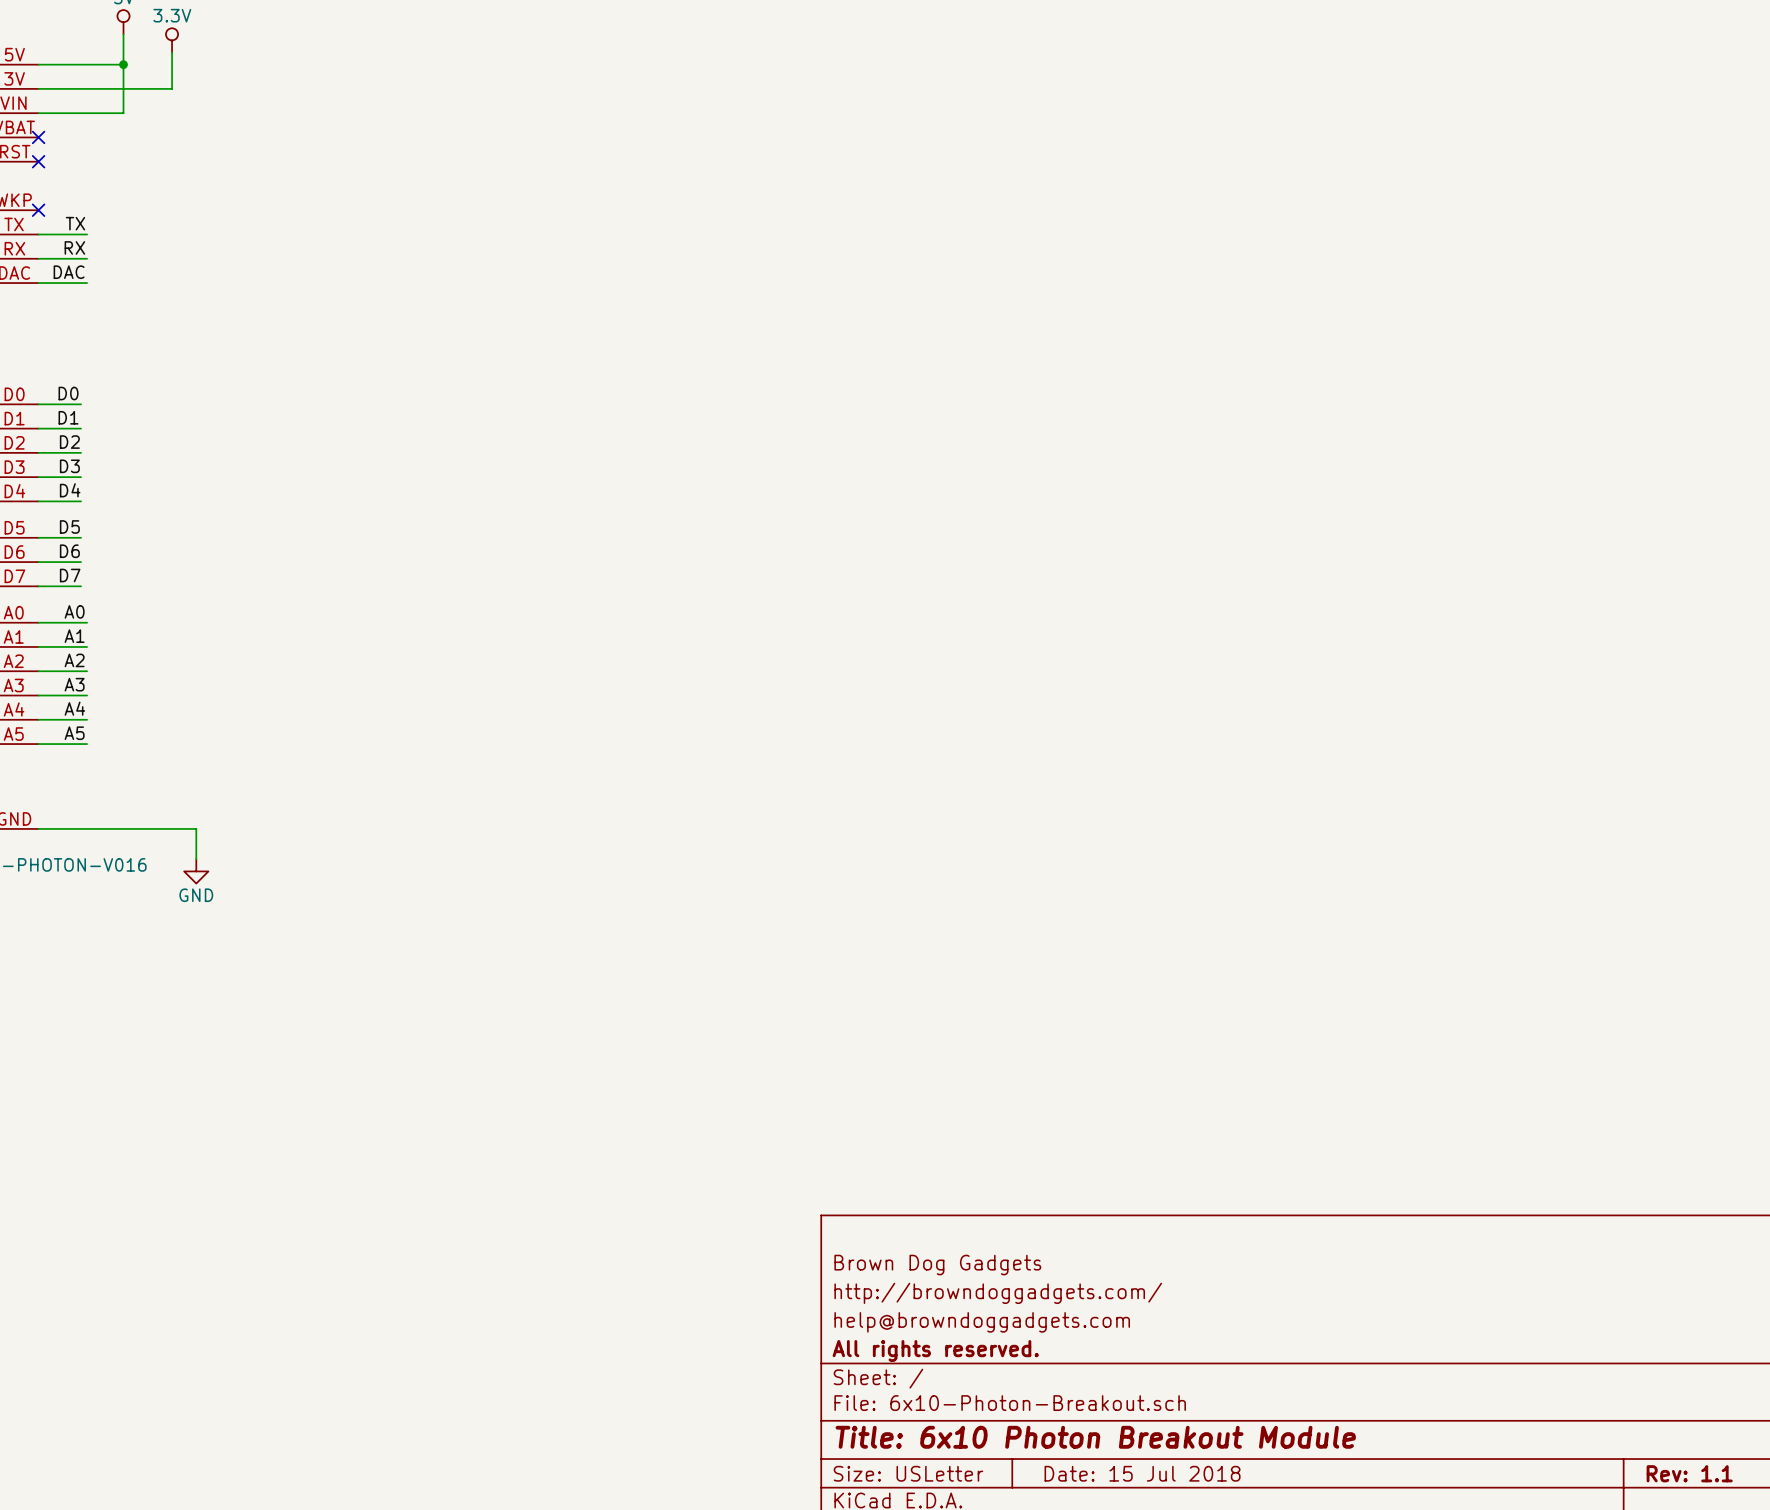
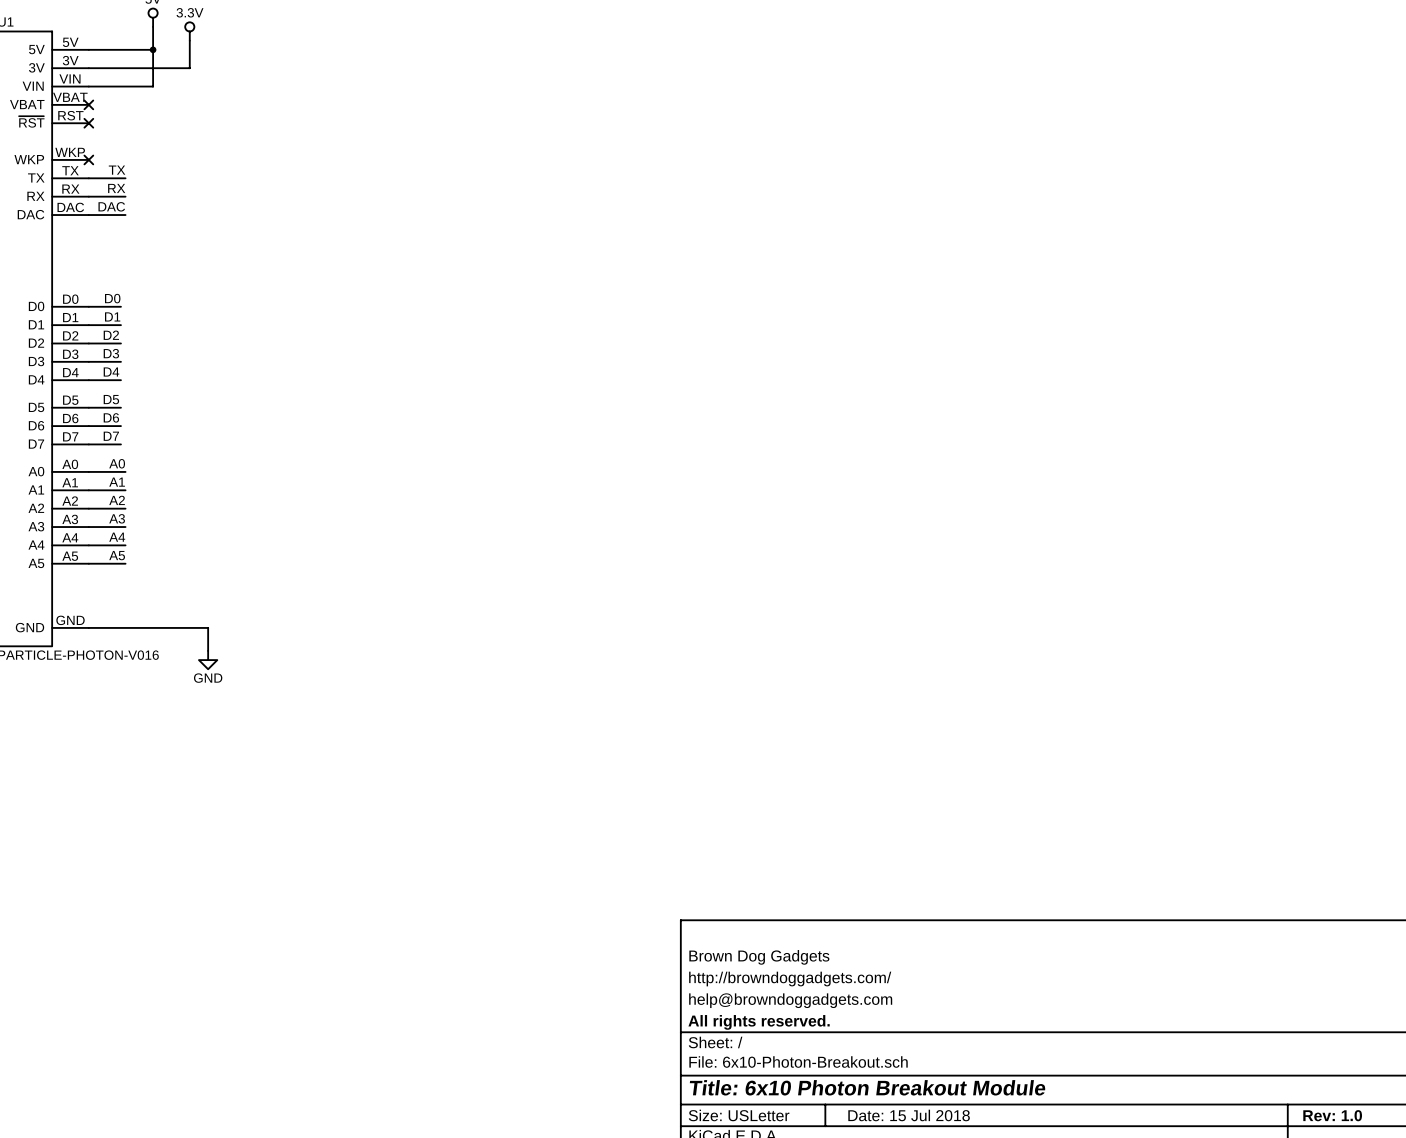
title block: Rev: 1.1 (1689, 1473) -> Rev: 1.0 (1332, 1115)

